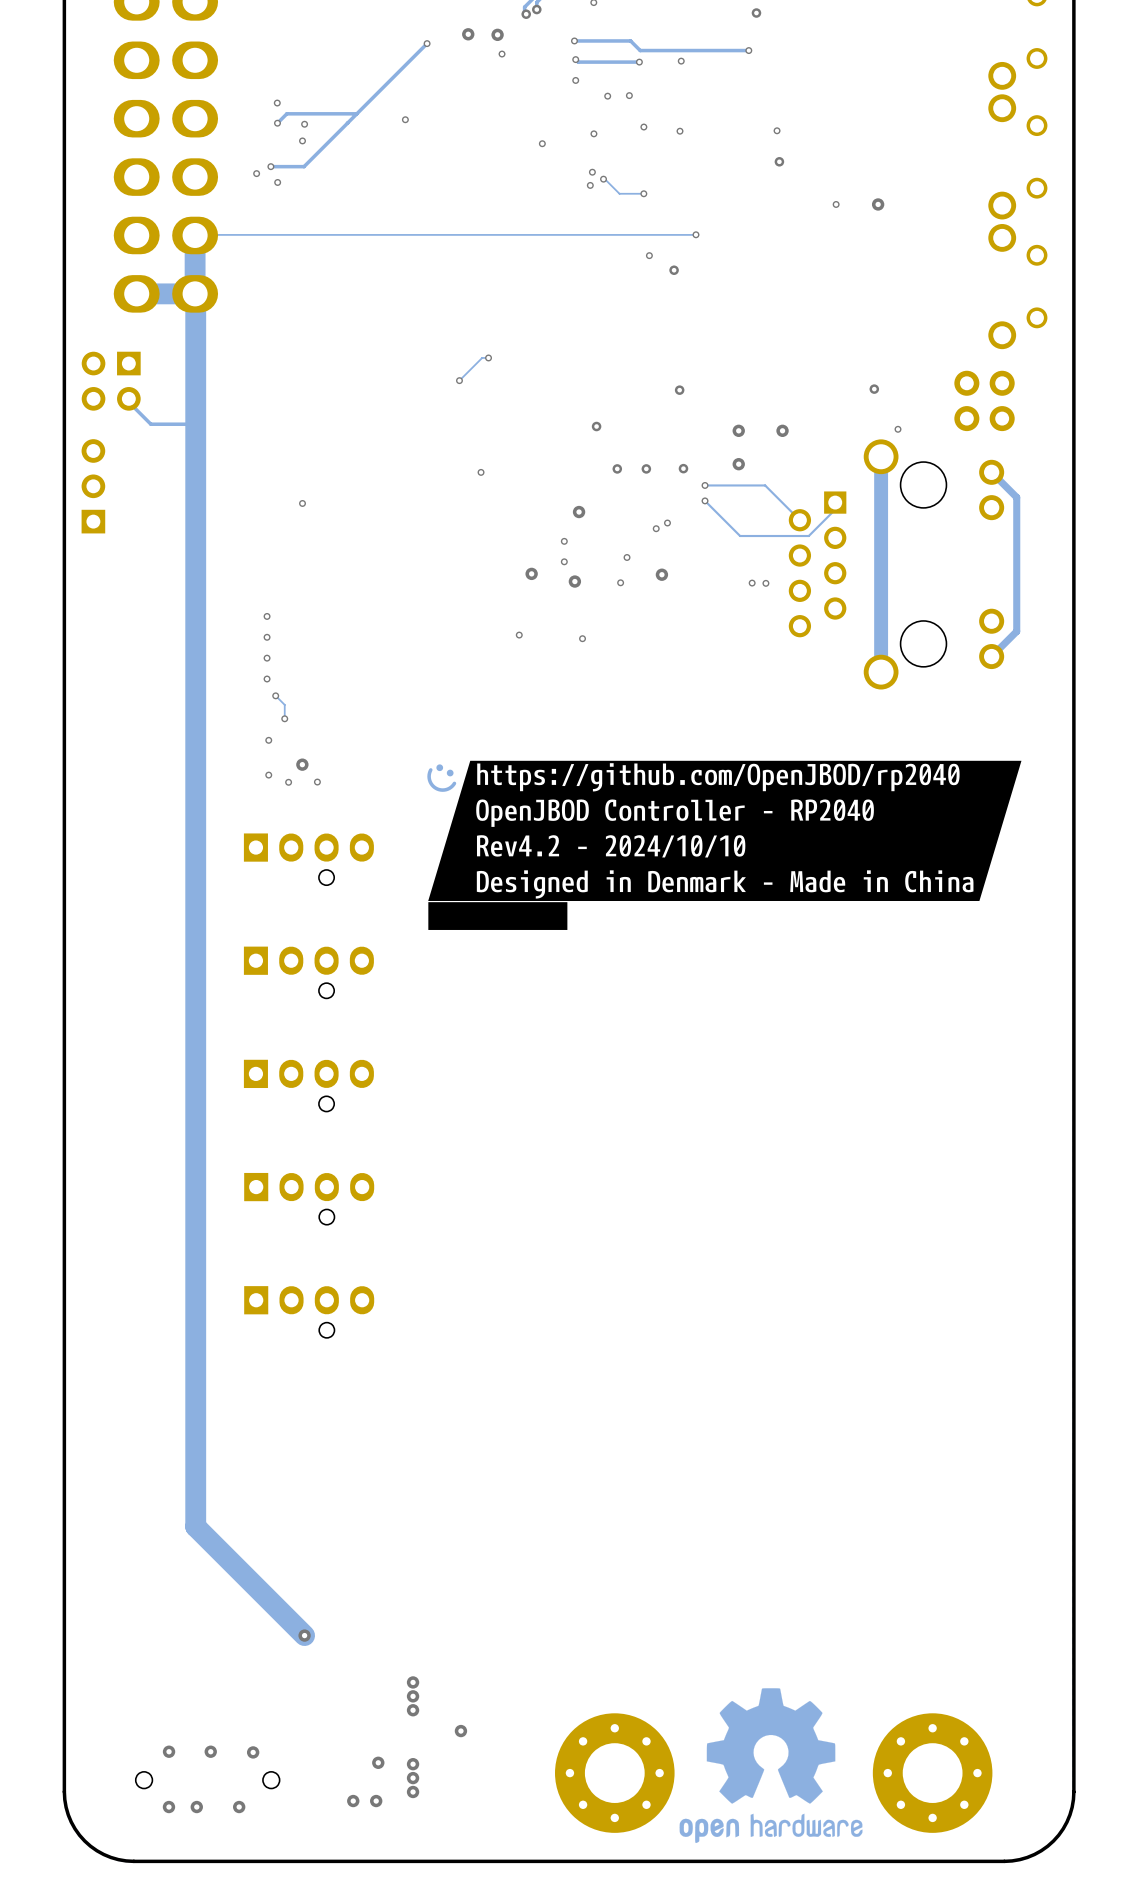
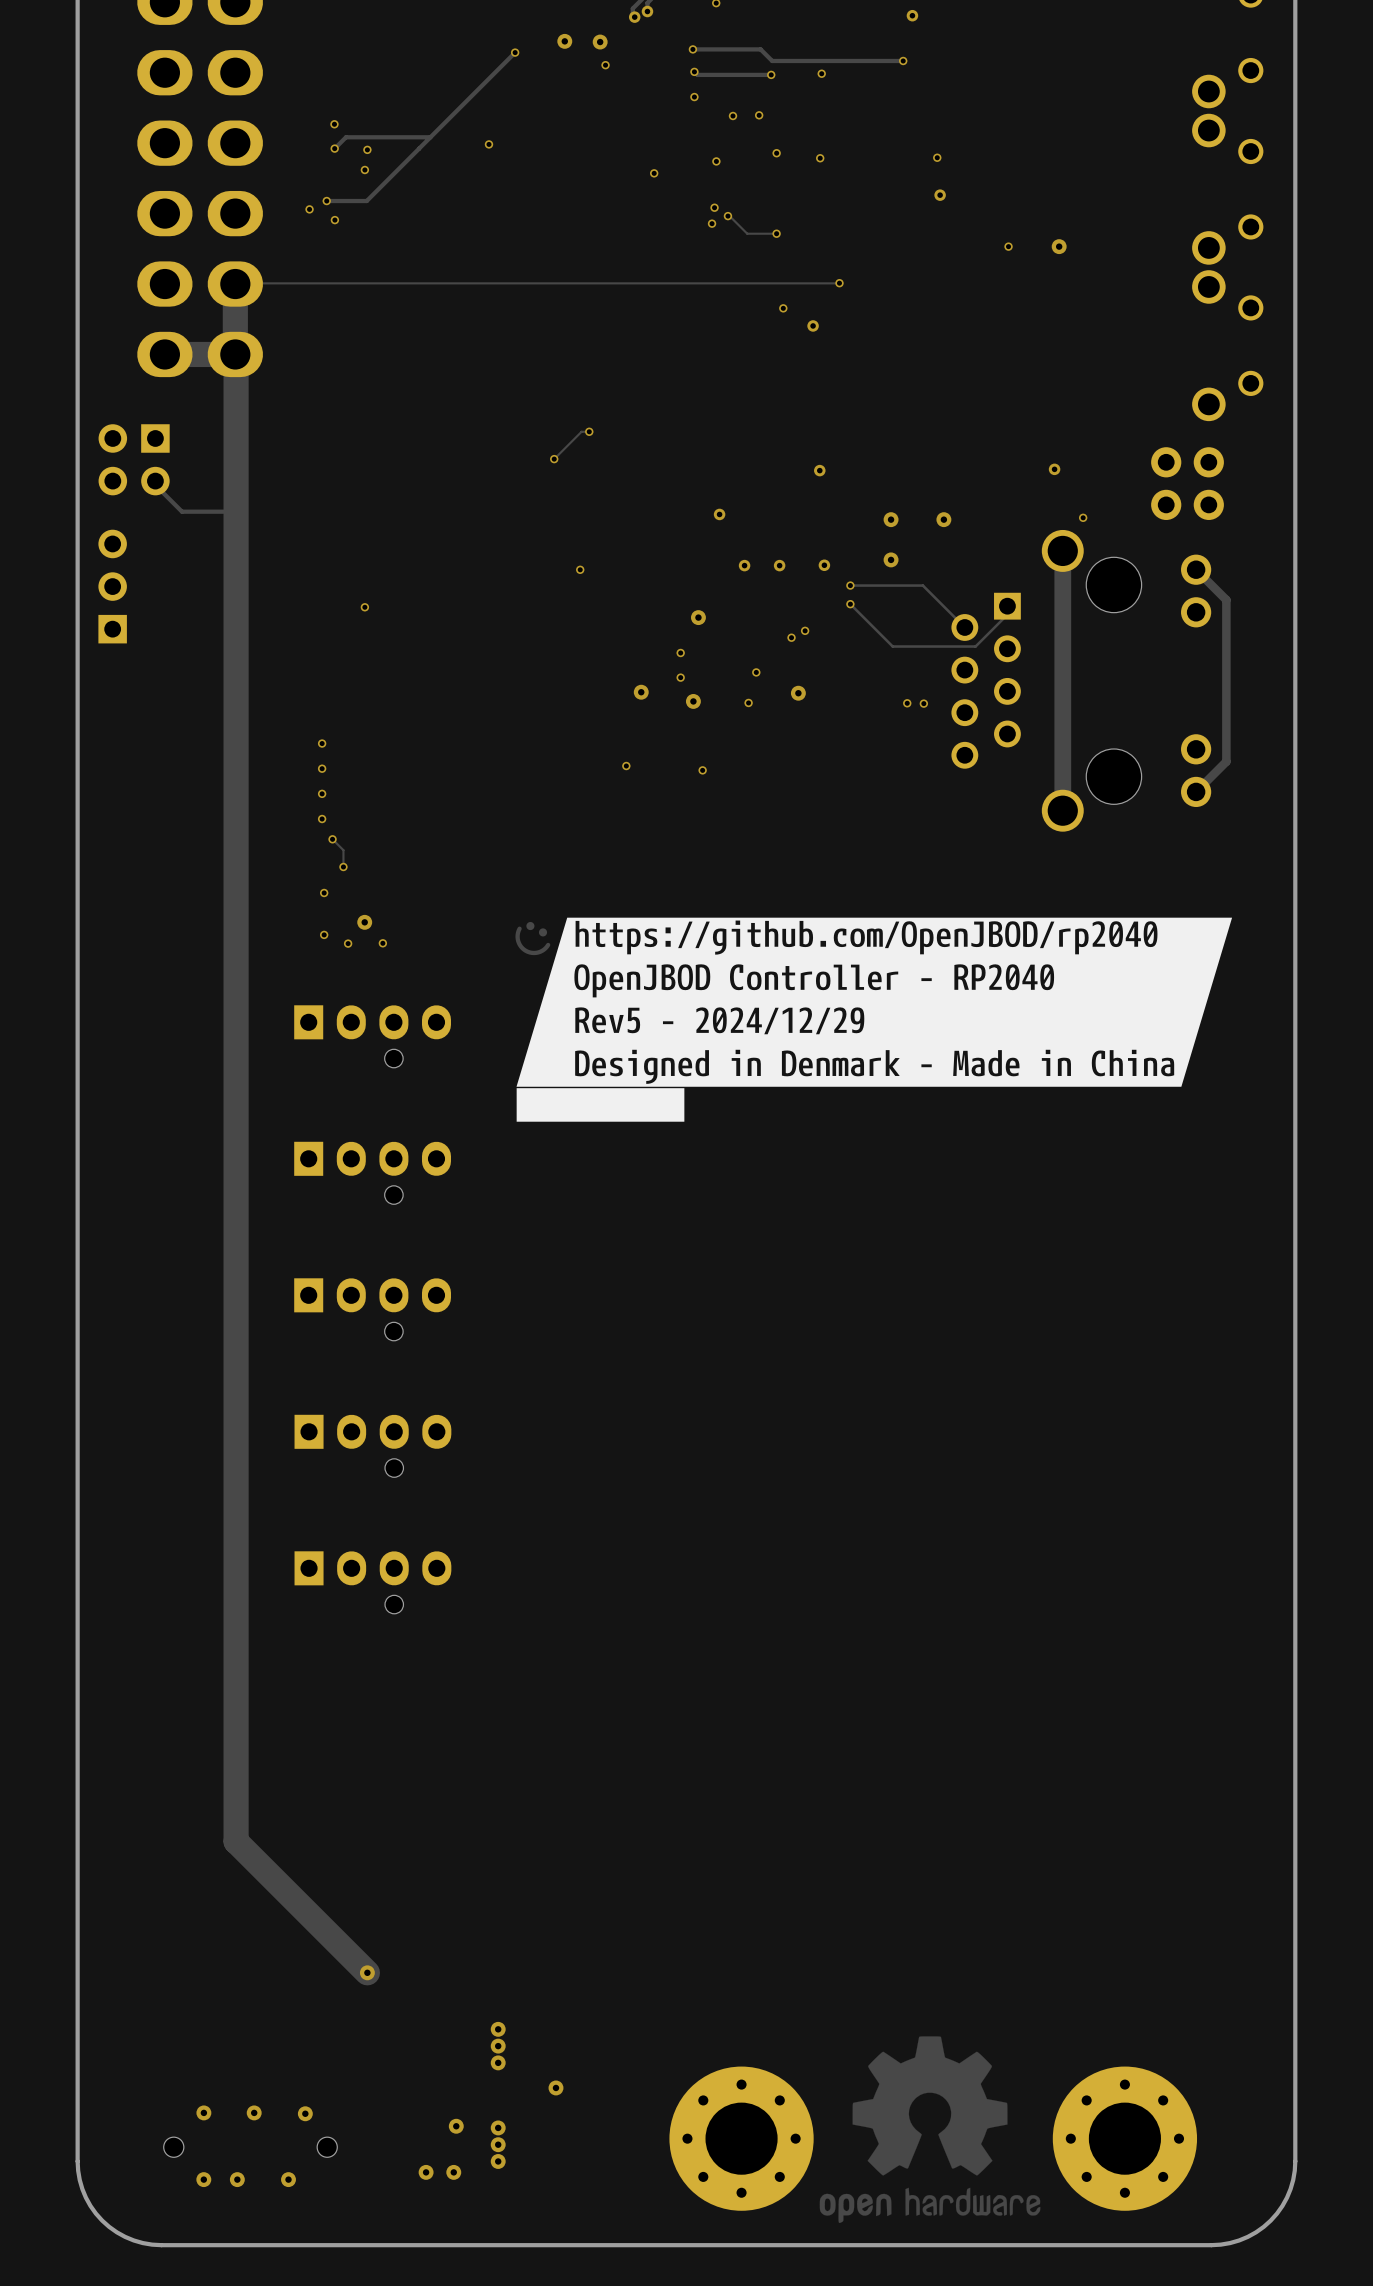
drawing shape: [428, 760, 1022, 901] -> [516, 917, 1233, 1087]

